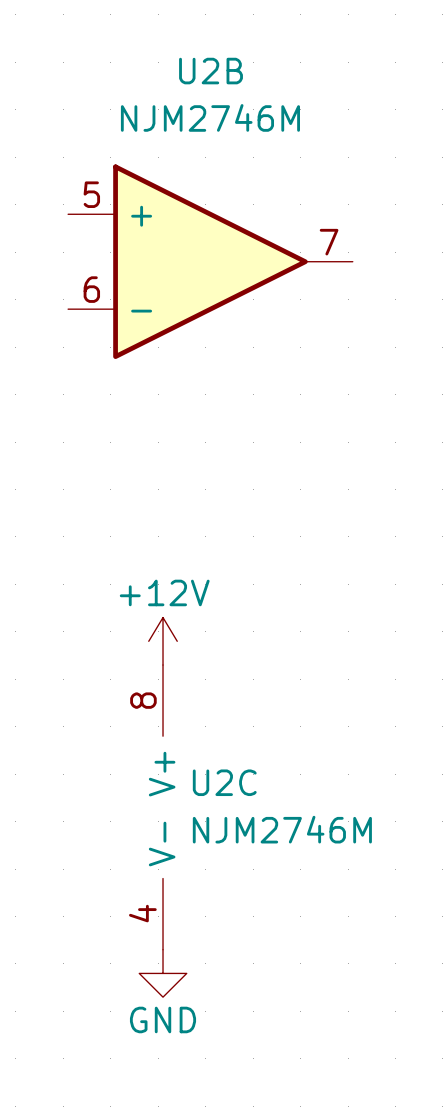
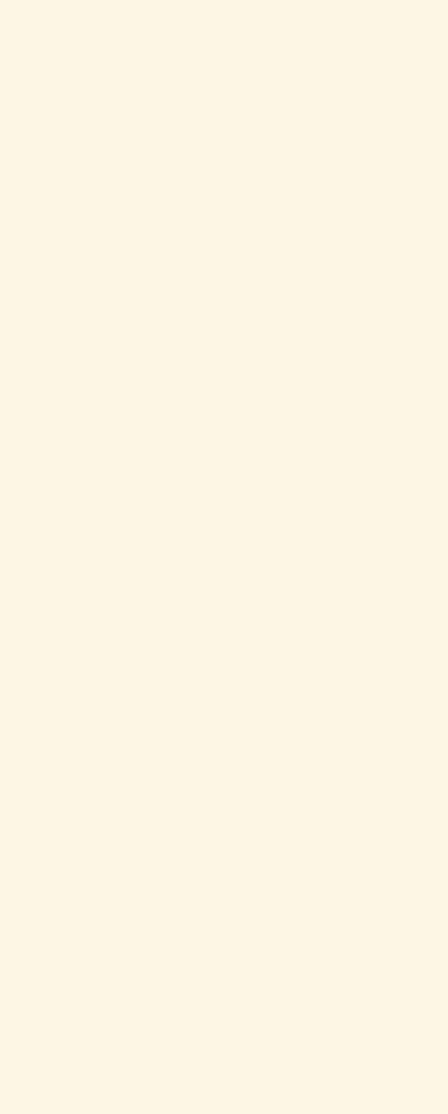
U2B: NJM2746M (210, 261) -> none
power symbol: +12V (163, 641) -> none
U2C: NJM2746M (163, 807) -> none
power symbol: GND (163, 973) -> none

